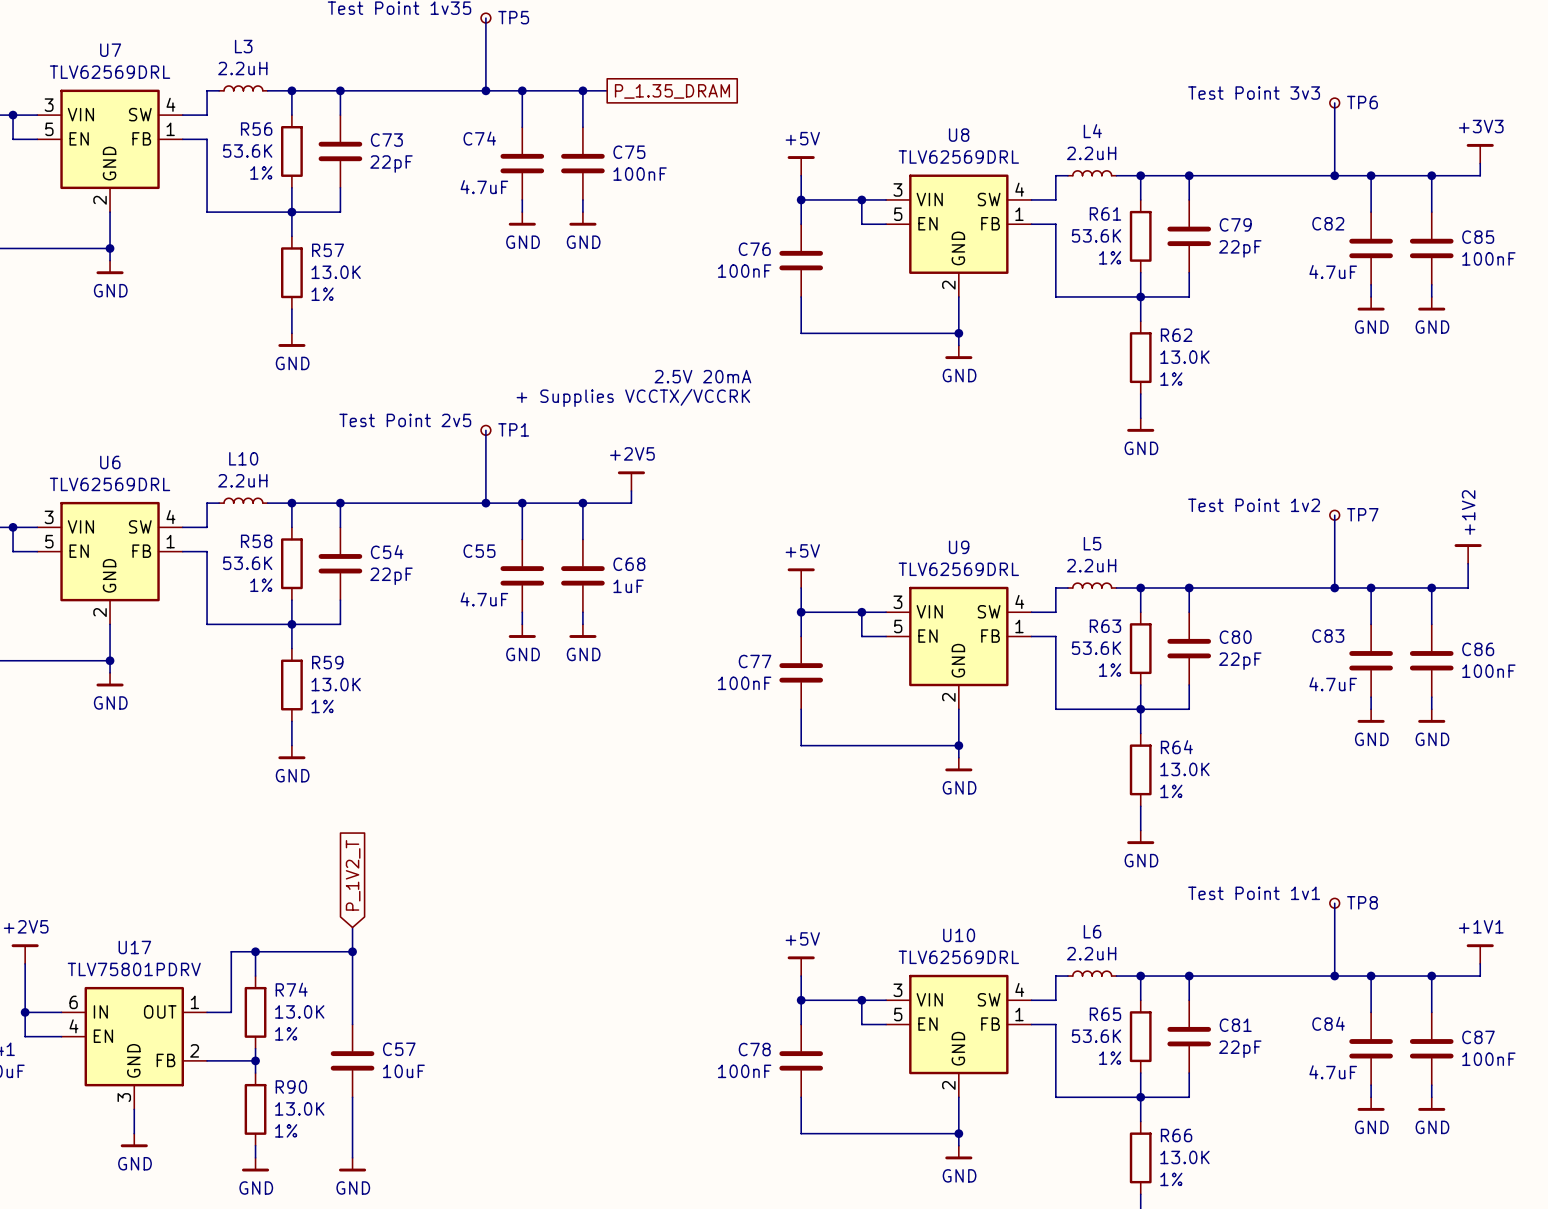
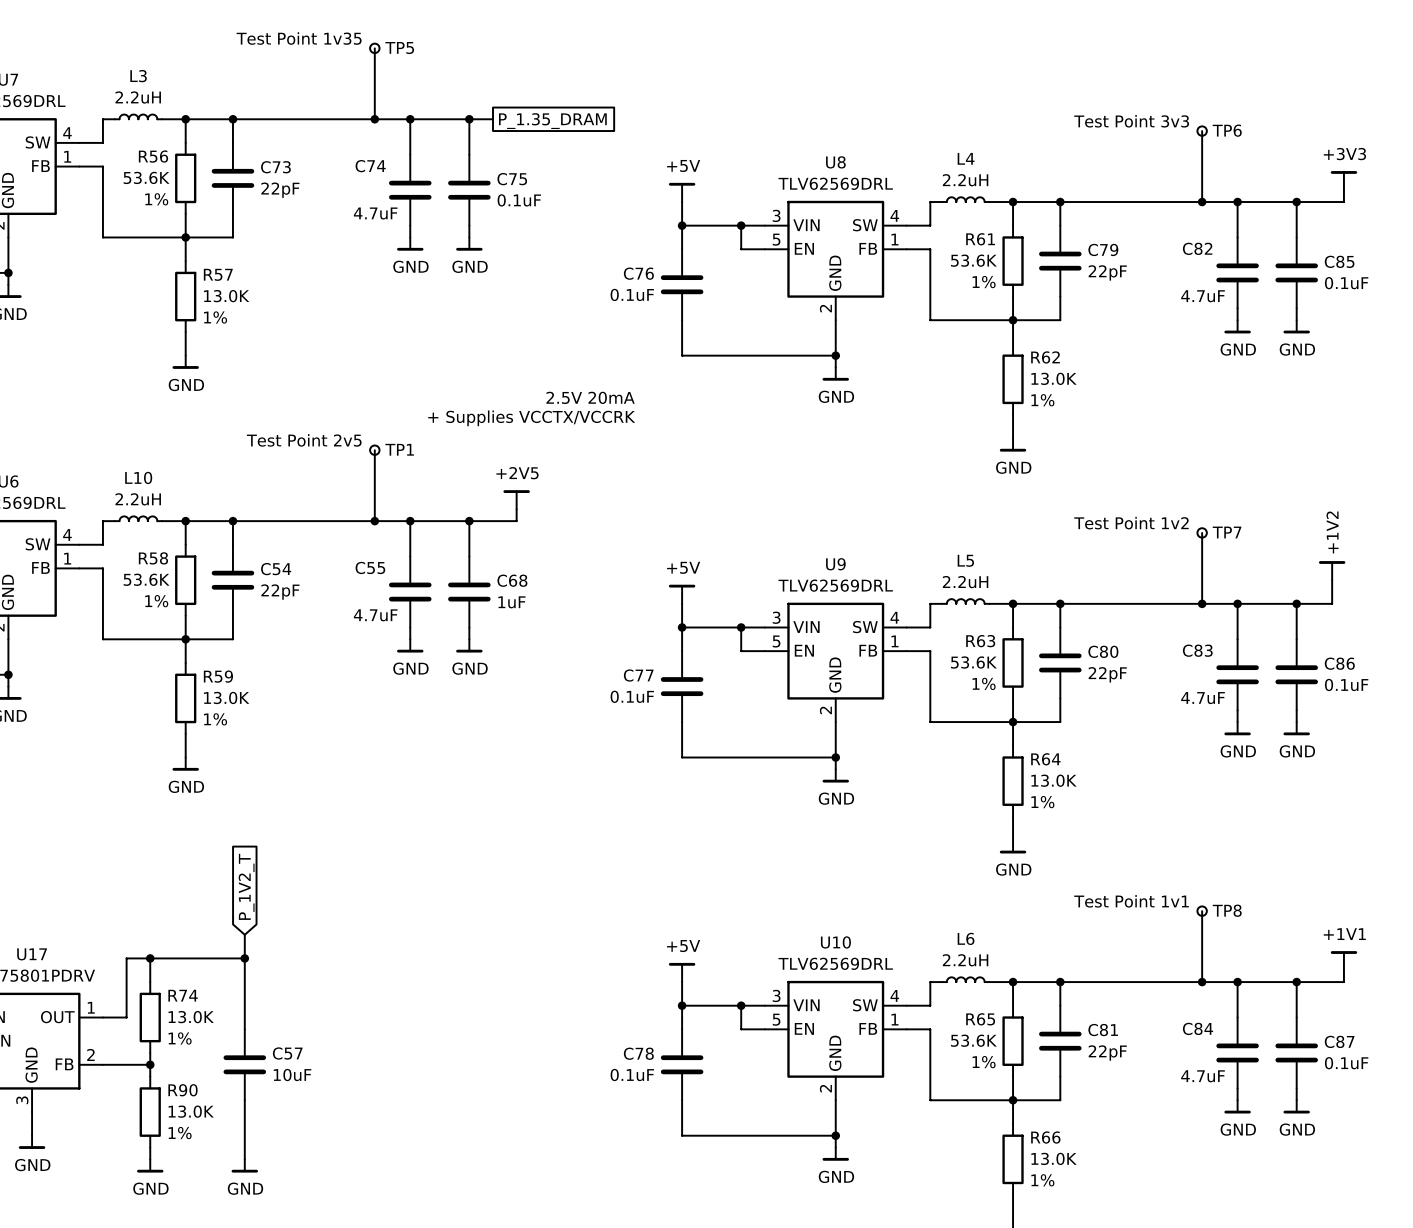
C75 value: 100nF (640, 174) -> 0.1uF (519, 200)
C85 value: 100nF (1488, 258) -> 0.1uF (1346, 283)
C76 value: 100nF (744, 271) -> 0.1uF (632, 294)
C86 value: 100nF (1488, 671) -> 0.1uF (1346, 684)
C77 value: 100nF (744, 683) -> 0.1uF (632, 696)
C87 value: 100nF (1488, 1059) -> 0.1uF (1346, 1063)
C78 value: 100nF (744, 1071) -> 0.1uF (632, 1075)

